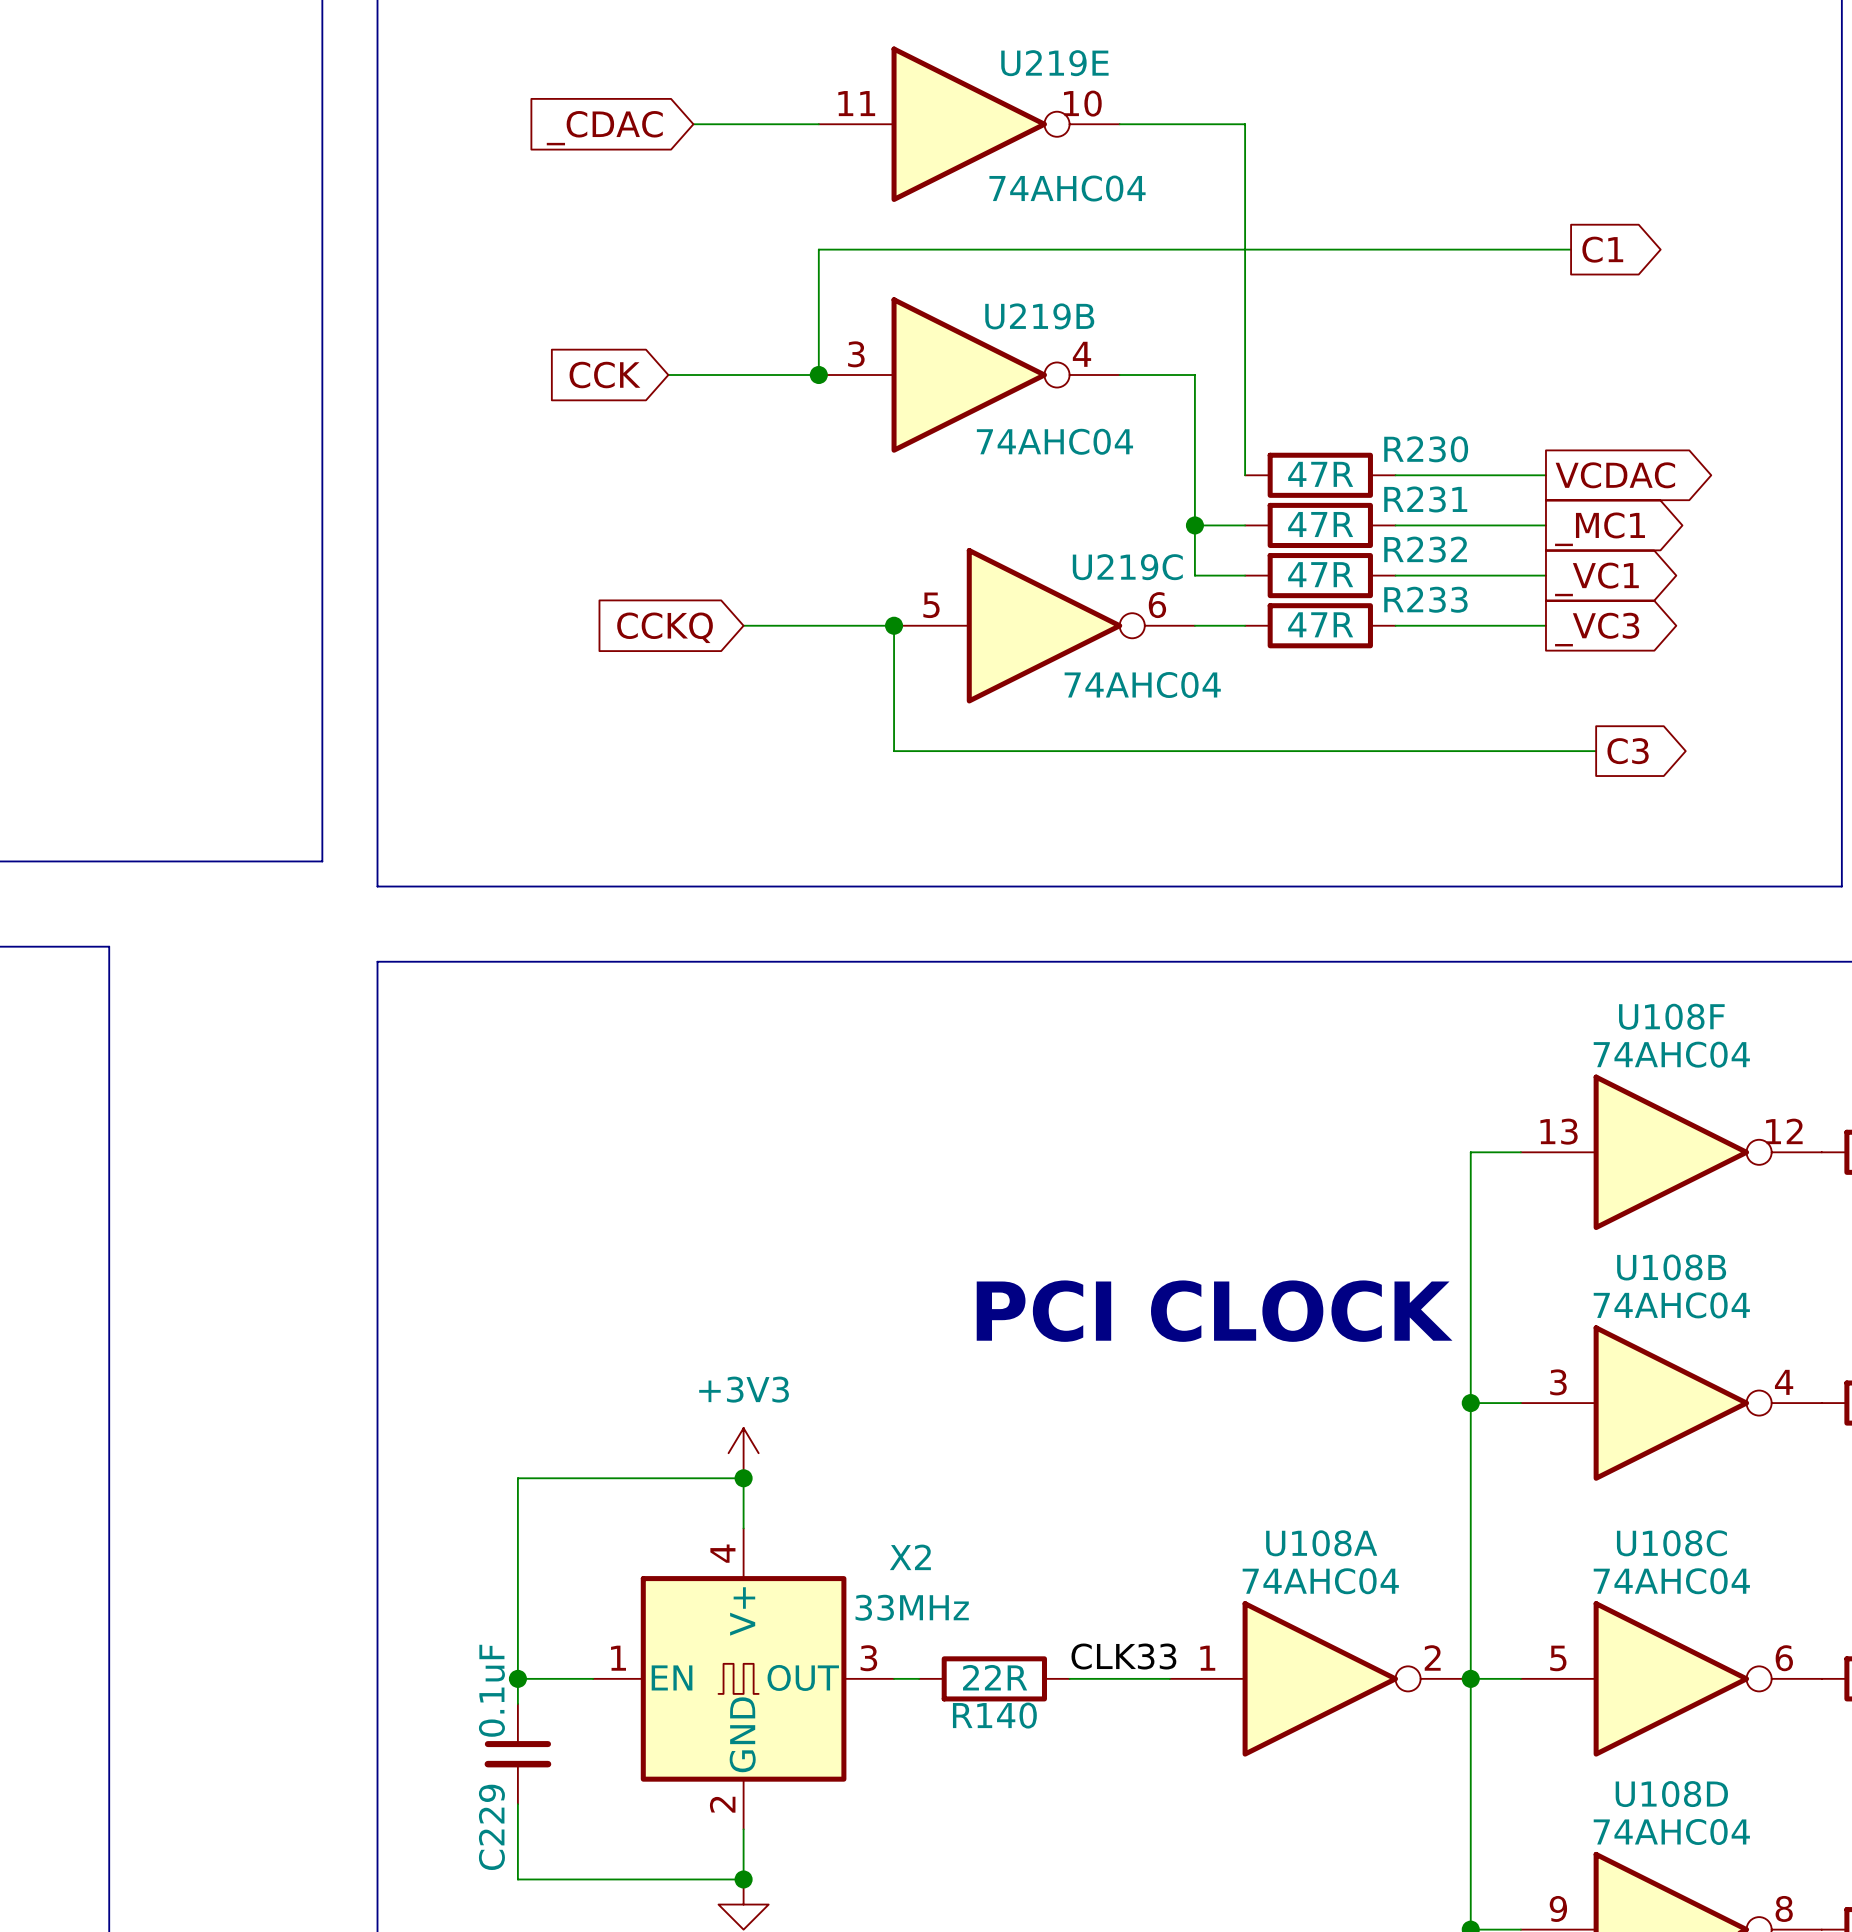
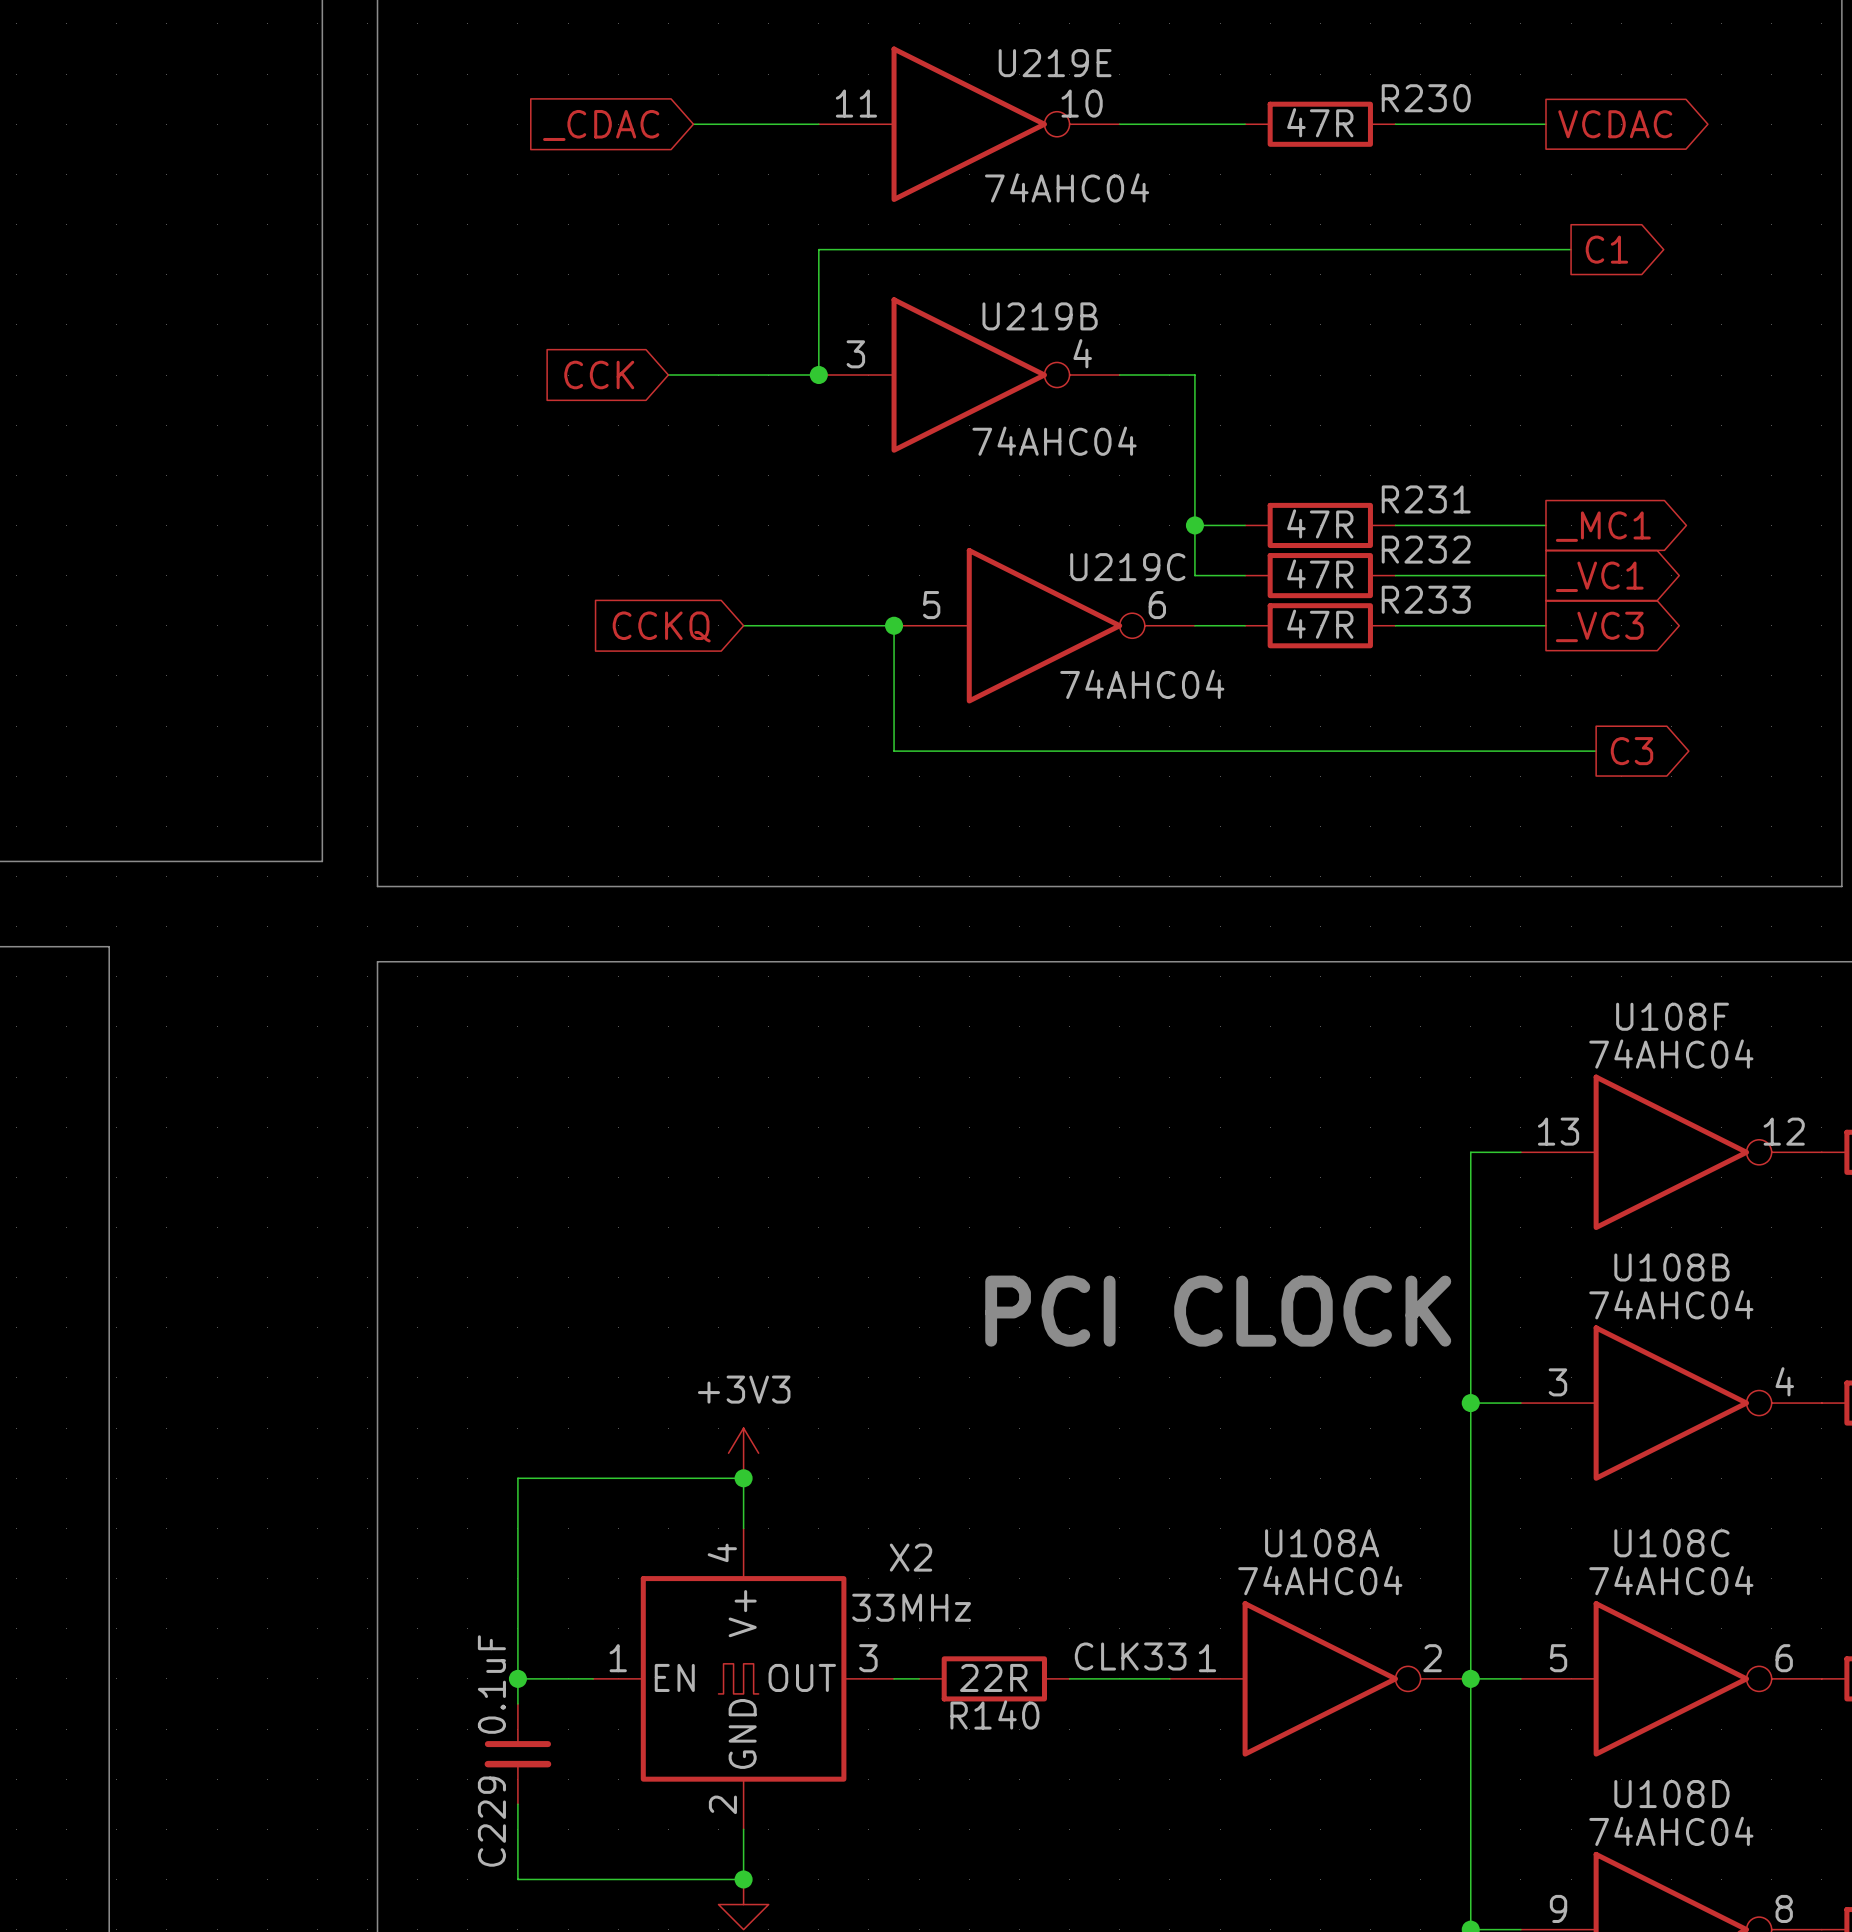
wire: (1245, 124) (1245, 475) -> none
R230 position: (1320, 475) -> (1320, 124)
wire: (1395, 475) (1545, 475) -> (1395, 124) (1545, 124)
global label position: VCDAC (1615, 475) -> VCDAC (1615, 124)

